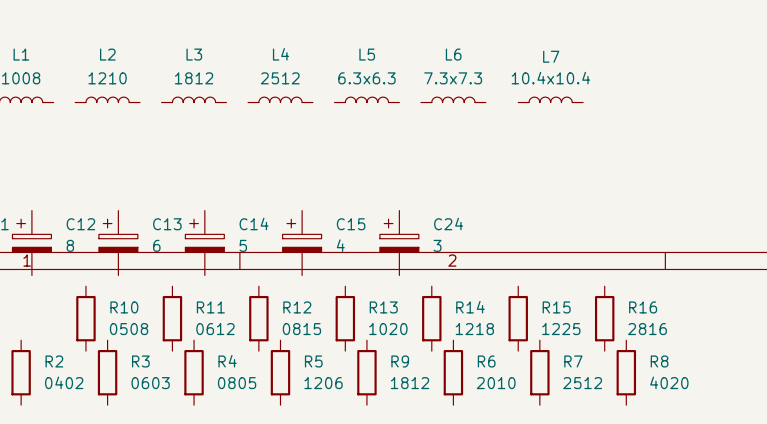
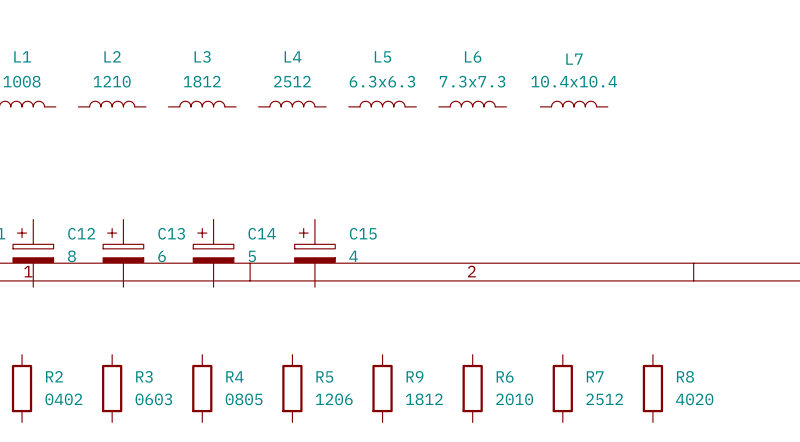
C24: 3 (399, 243) -> none
R10: 0508 (85, 318) -> none
R11: 0612 (172, 318) -> none
R12: 0815 (258, 318) -> none
R13: 1020 (345, 318) -> none
R14: 1218 (431, 318) -> none
R15: 1225 (518, 318) -> none
R16: 2816 (604, 318) -> none

